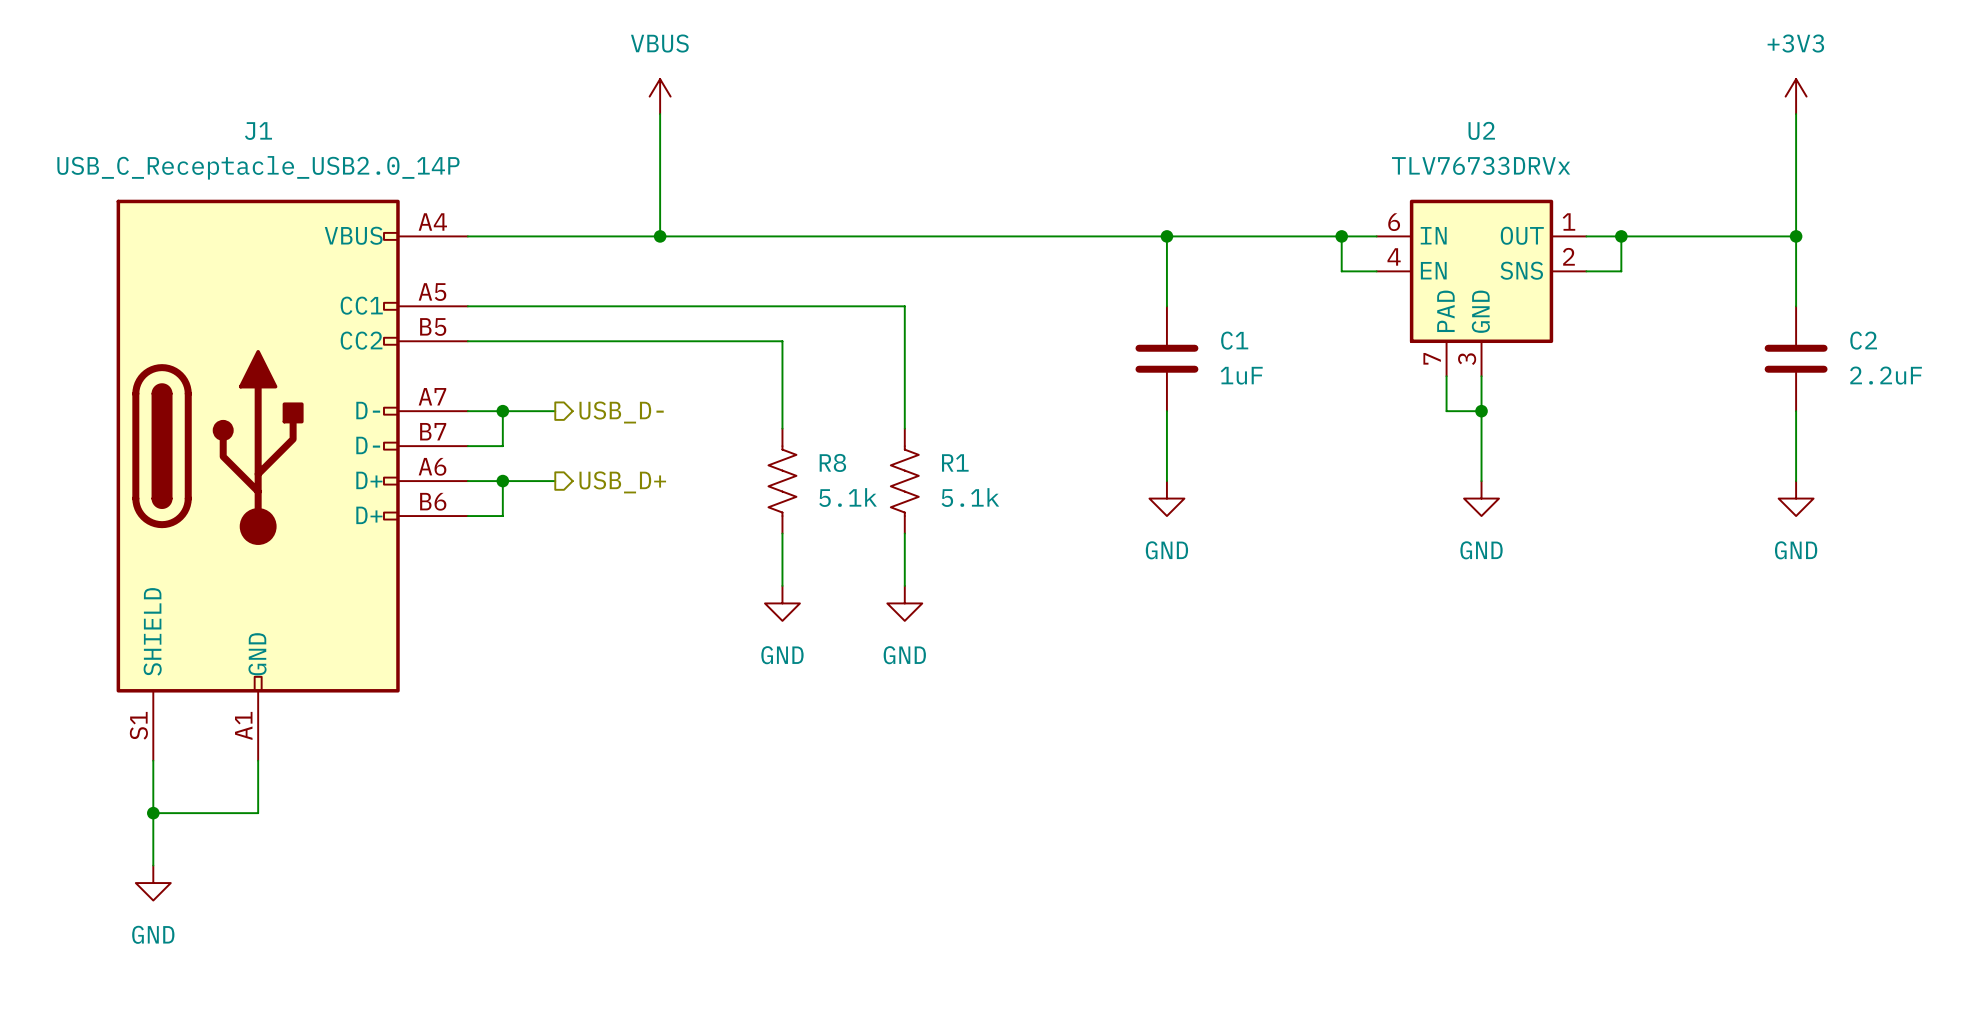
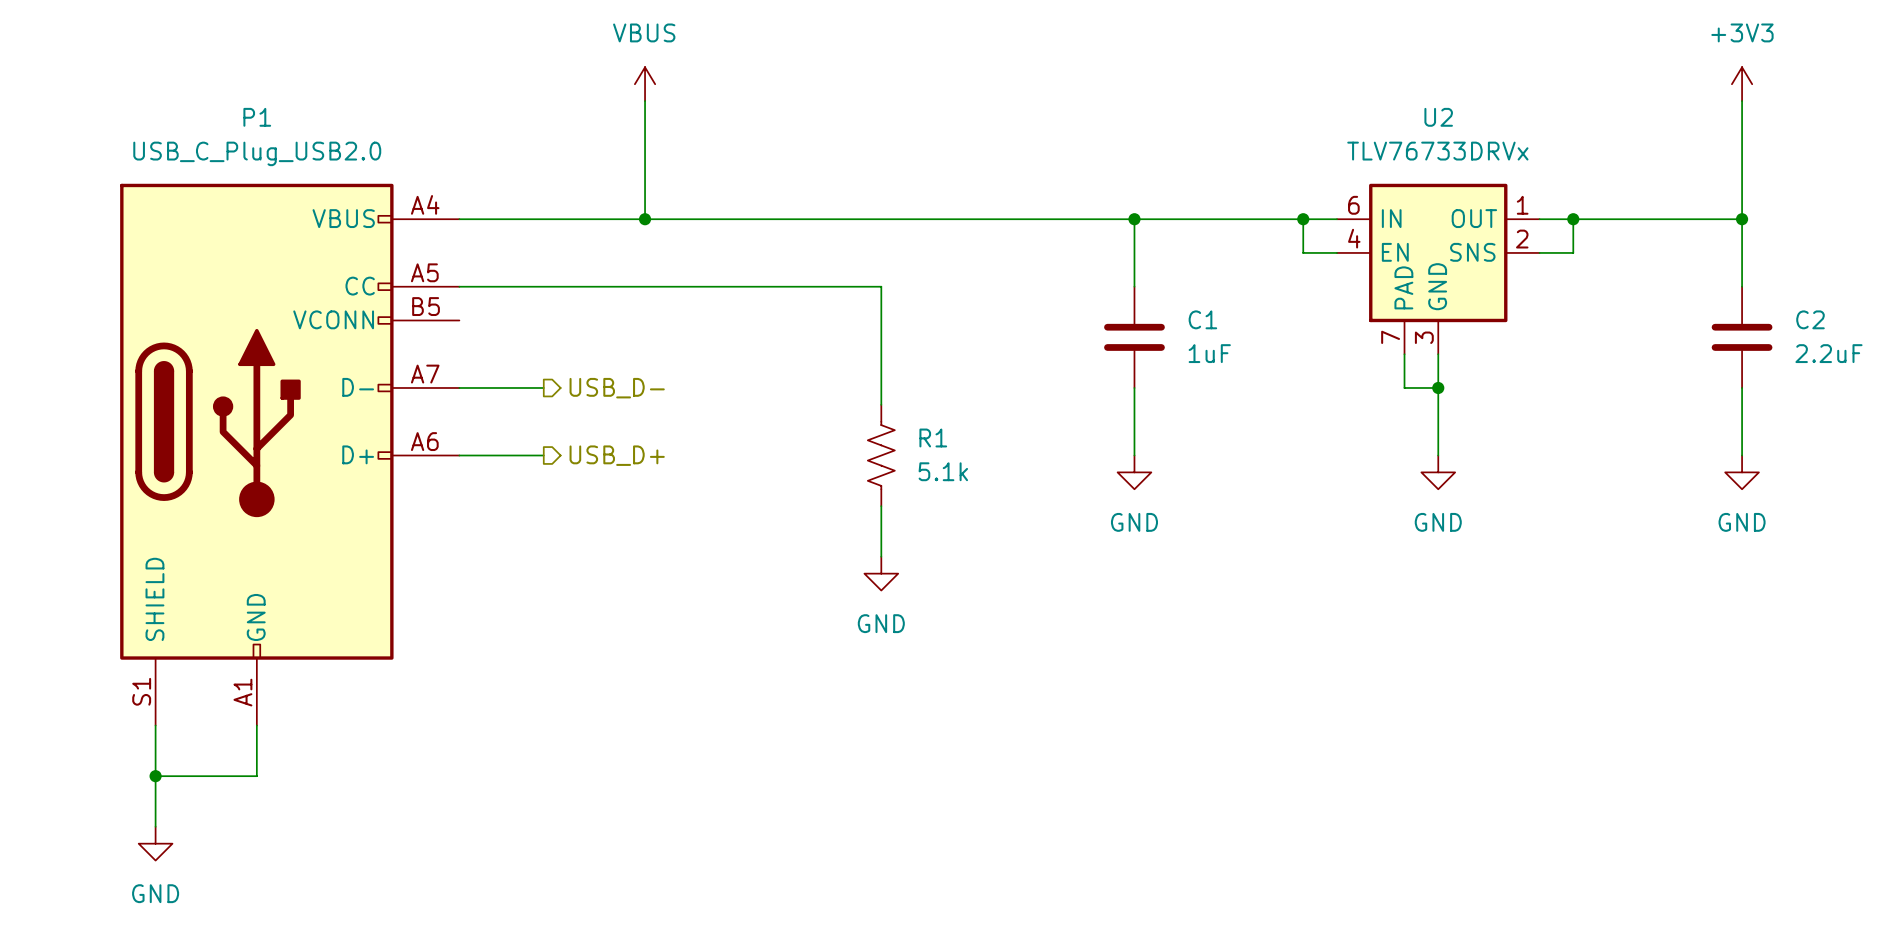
wire: (467, 341) (782, 341) (782, 428) -> none
wire: (502, 411) (502, 446) (467, 446) -> none
junction: (502, 411) -> none
J1: USB_C_Receptacle_USB2.0_14P (292, 480) -> none
P1: none -> USB_C_Plug_USB2.0 (289, 454)
wire: (502, 481) (502, 516) (467, 516) -> none
junction: (502, 481) -> none
R8: 5.1k (782, 481) -> none
wire: (782, 533) (782, 585) -> none
power symbol: GND (782, 603) -> none

